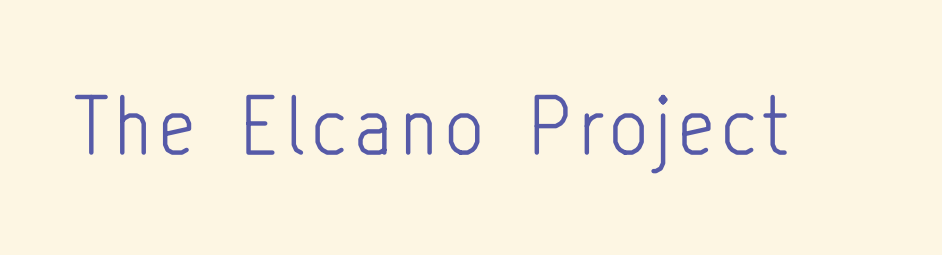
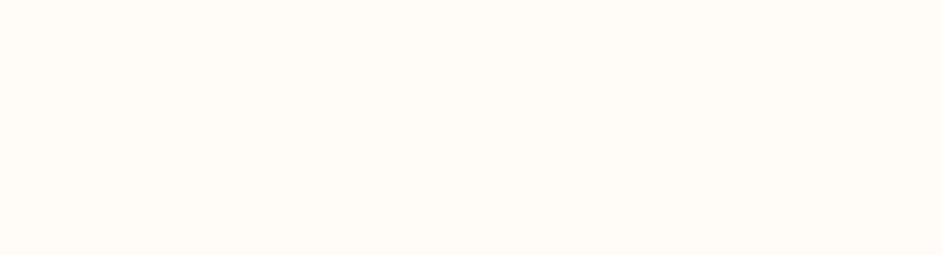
text: The Elcano Project (430, 134) -> none

